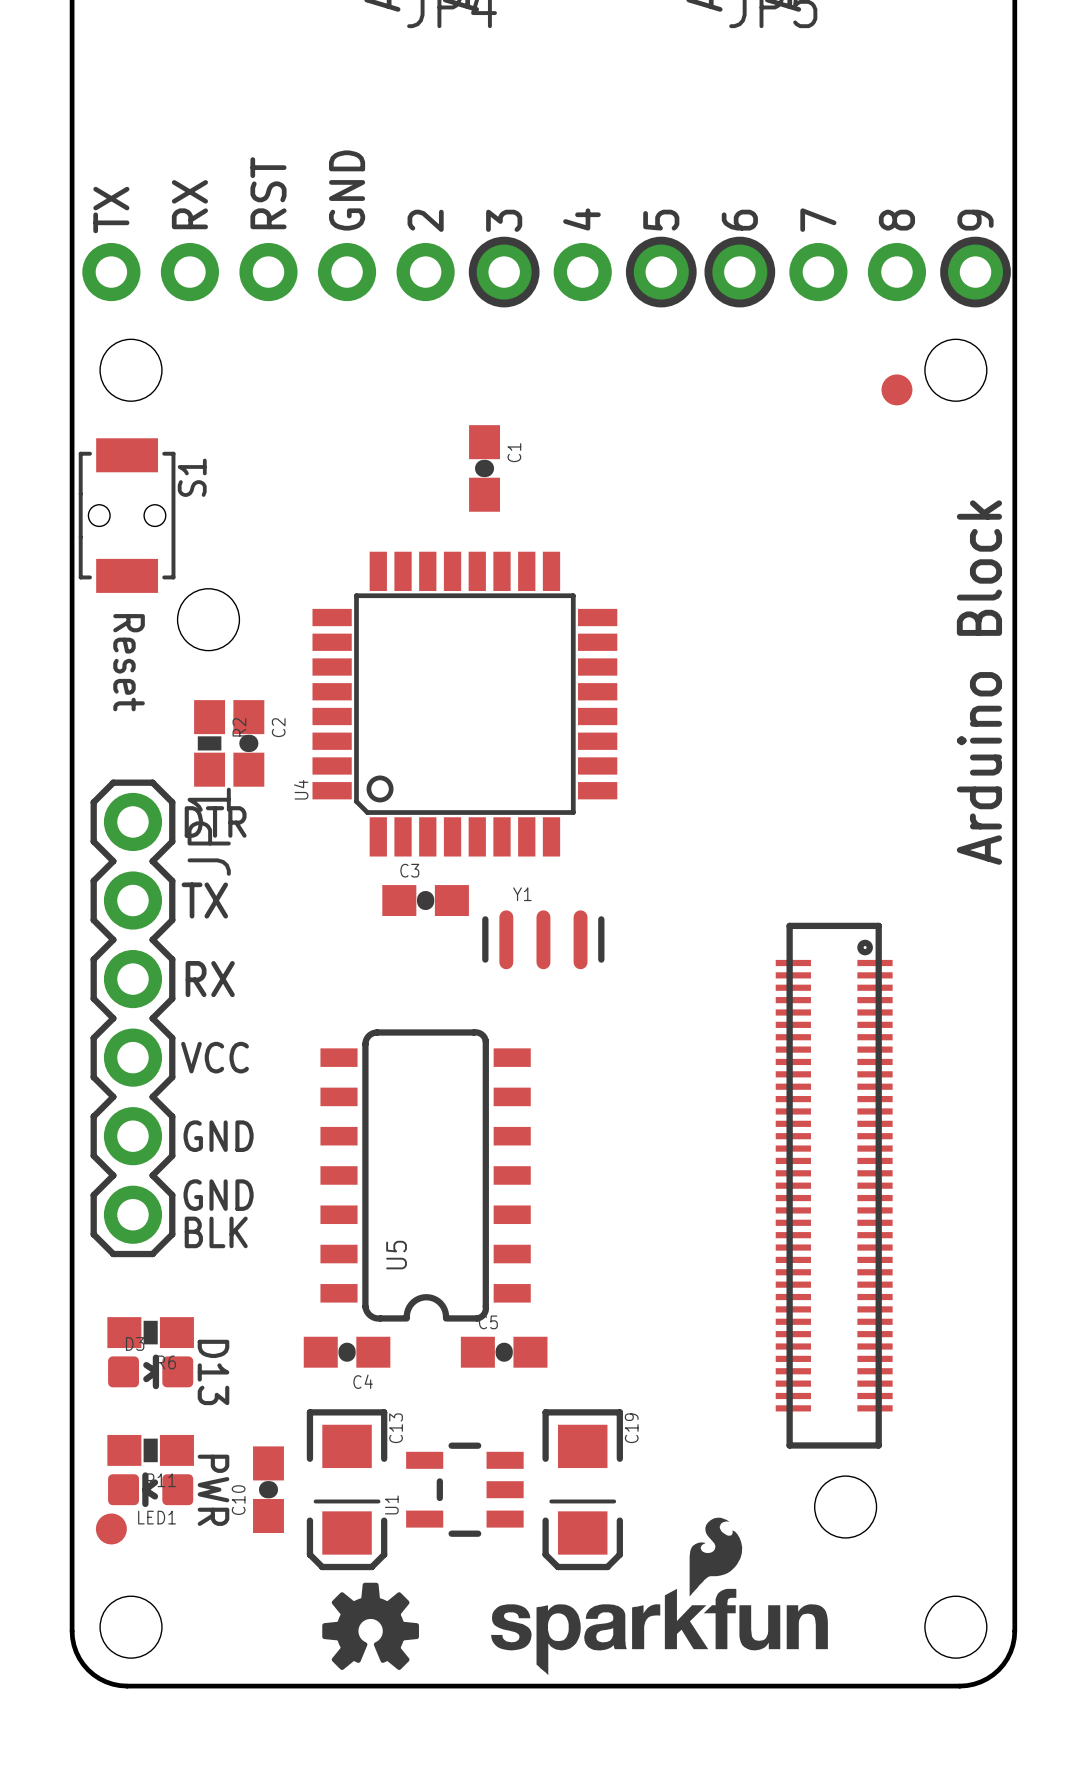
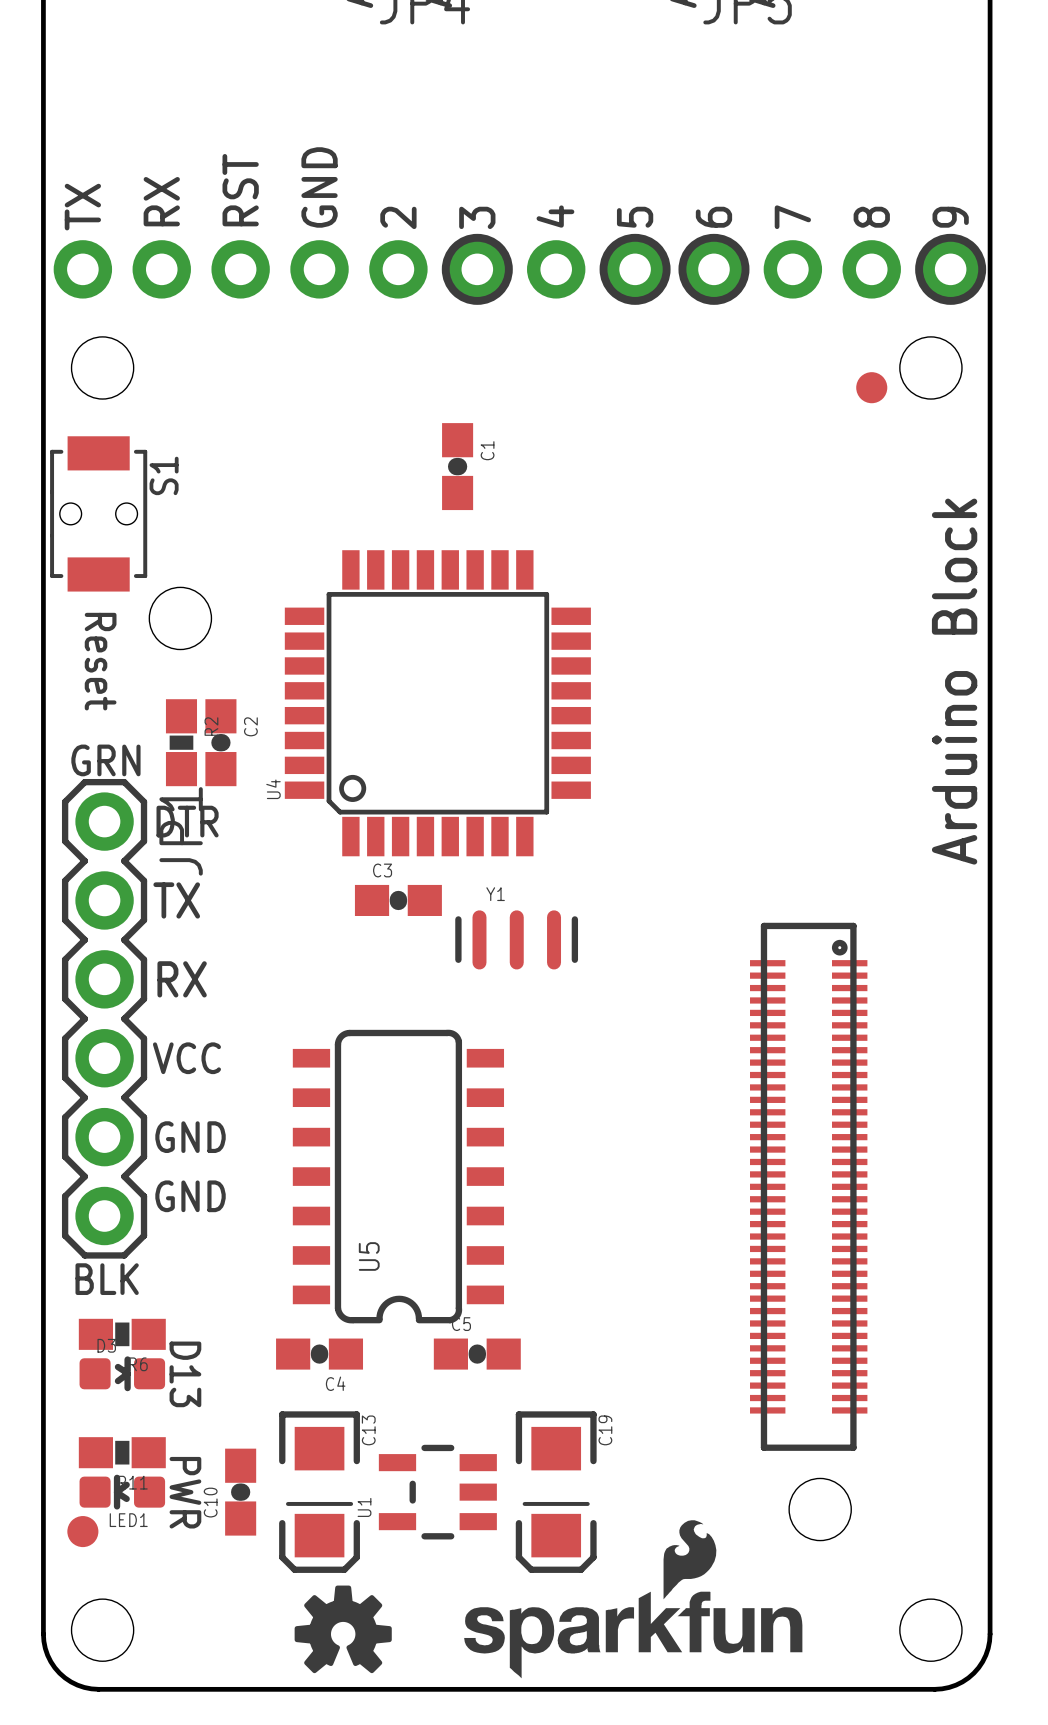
text: none -> GRN (105, 760)
text position: BLK (216, 1232) -> BLK (107, 1279)

